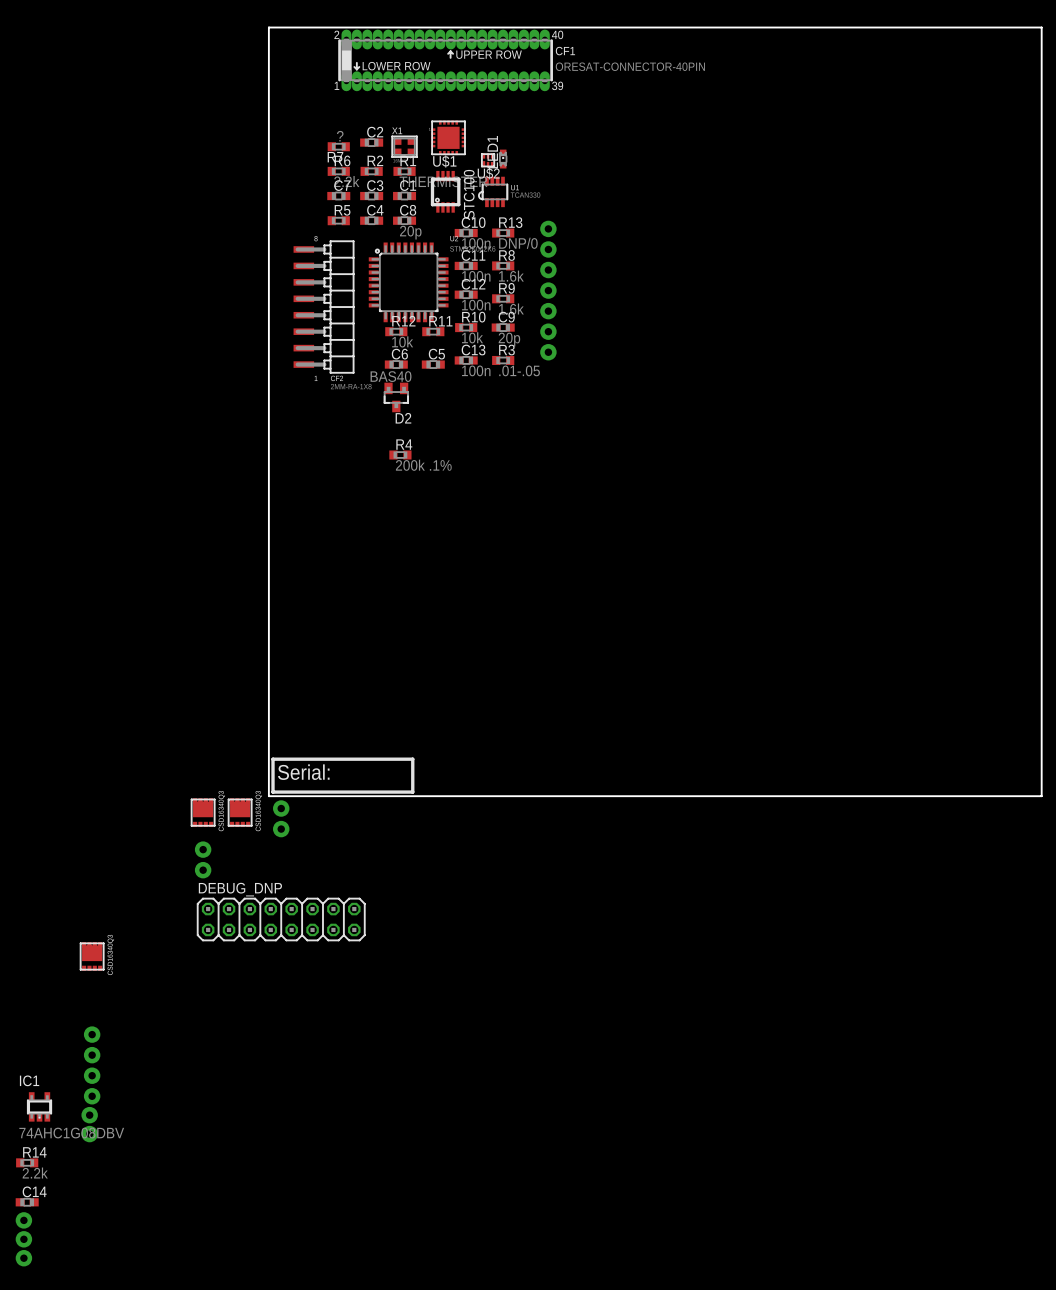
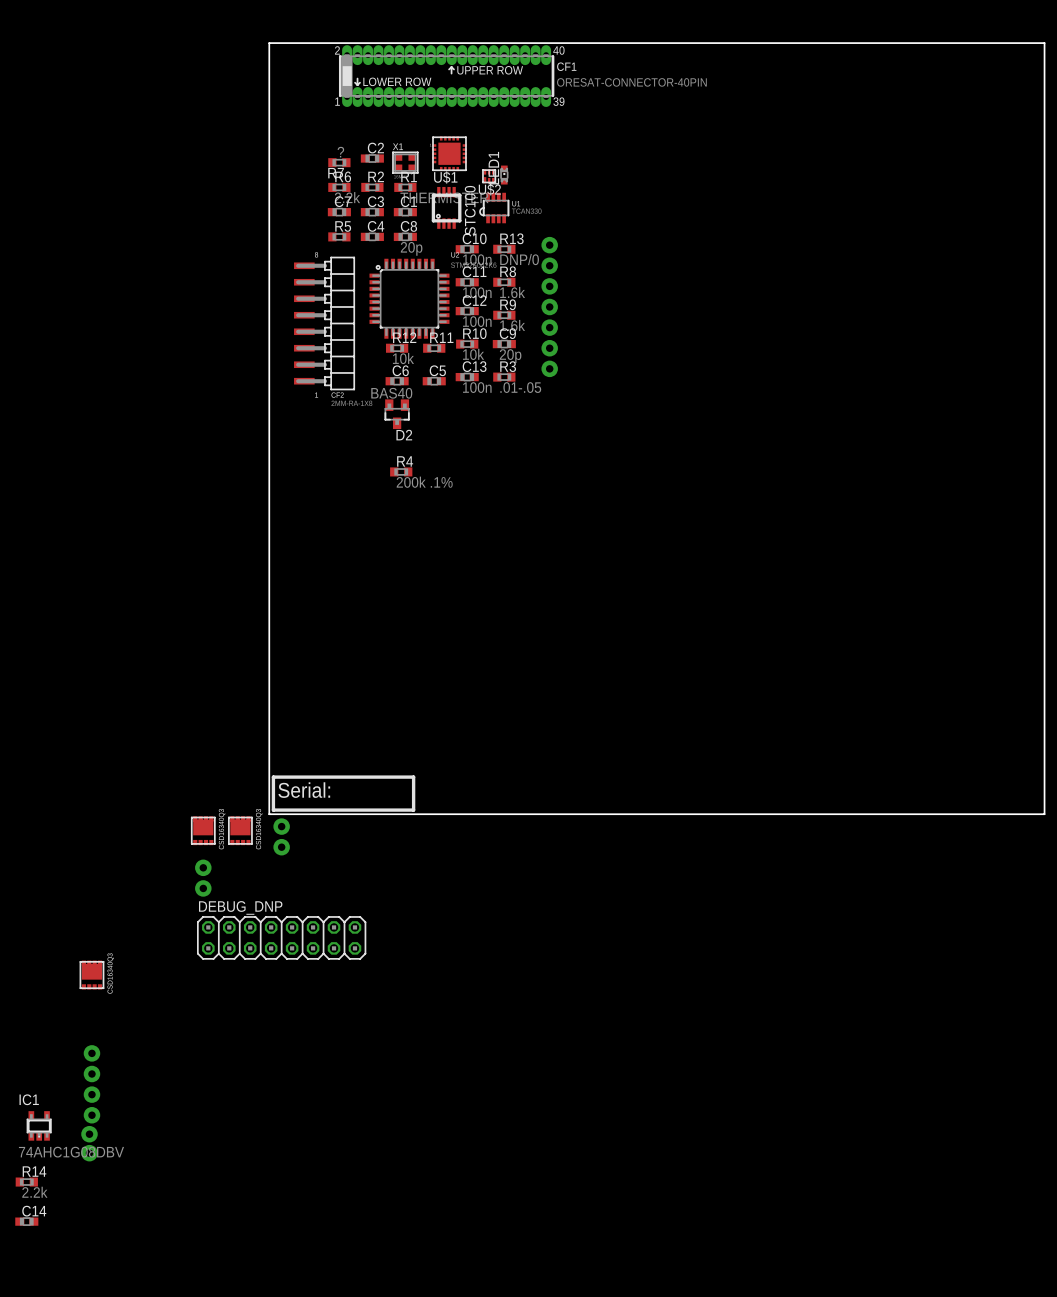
part: (23, 1220) -> none
part: (23, 1239) -> none
part: (23, 1258) -> none

